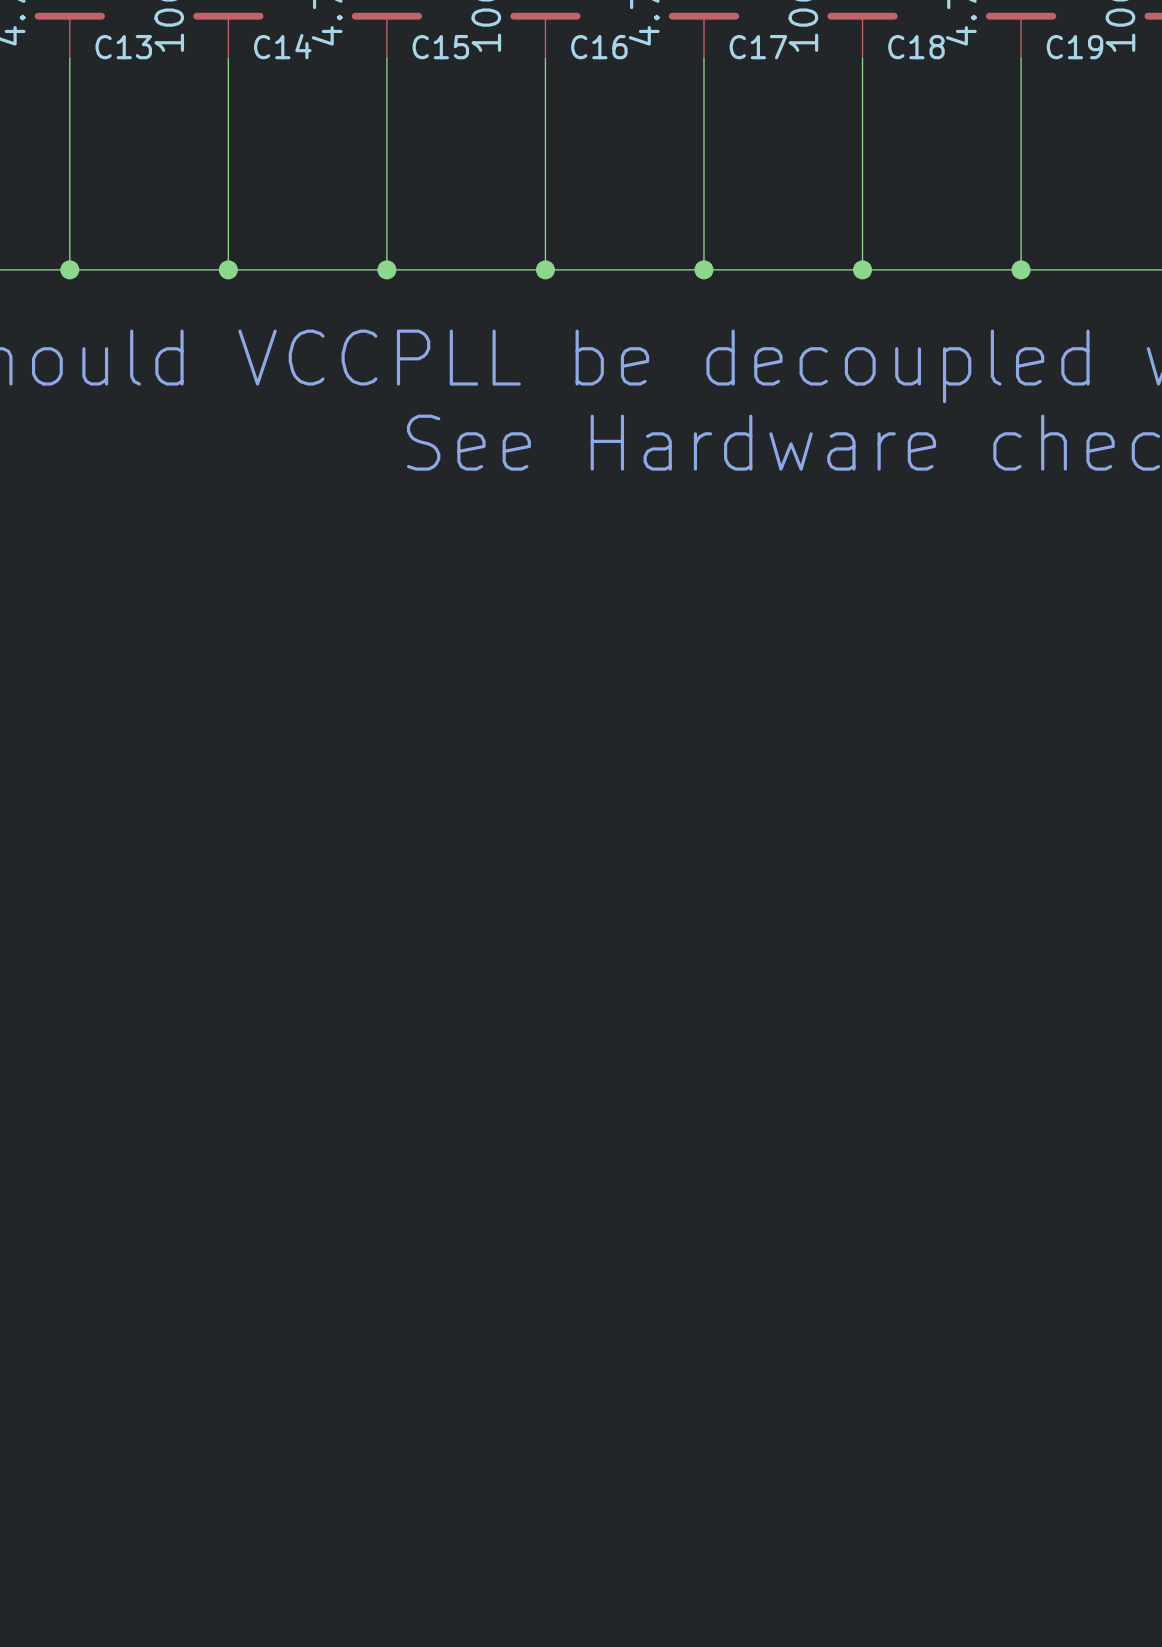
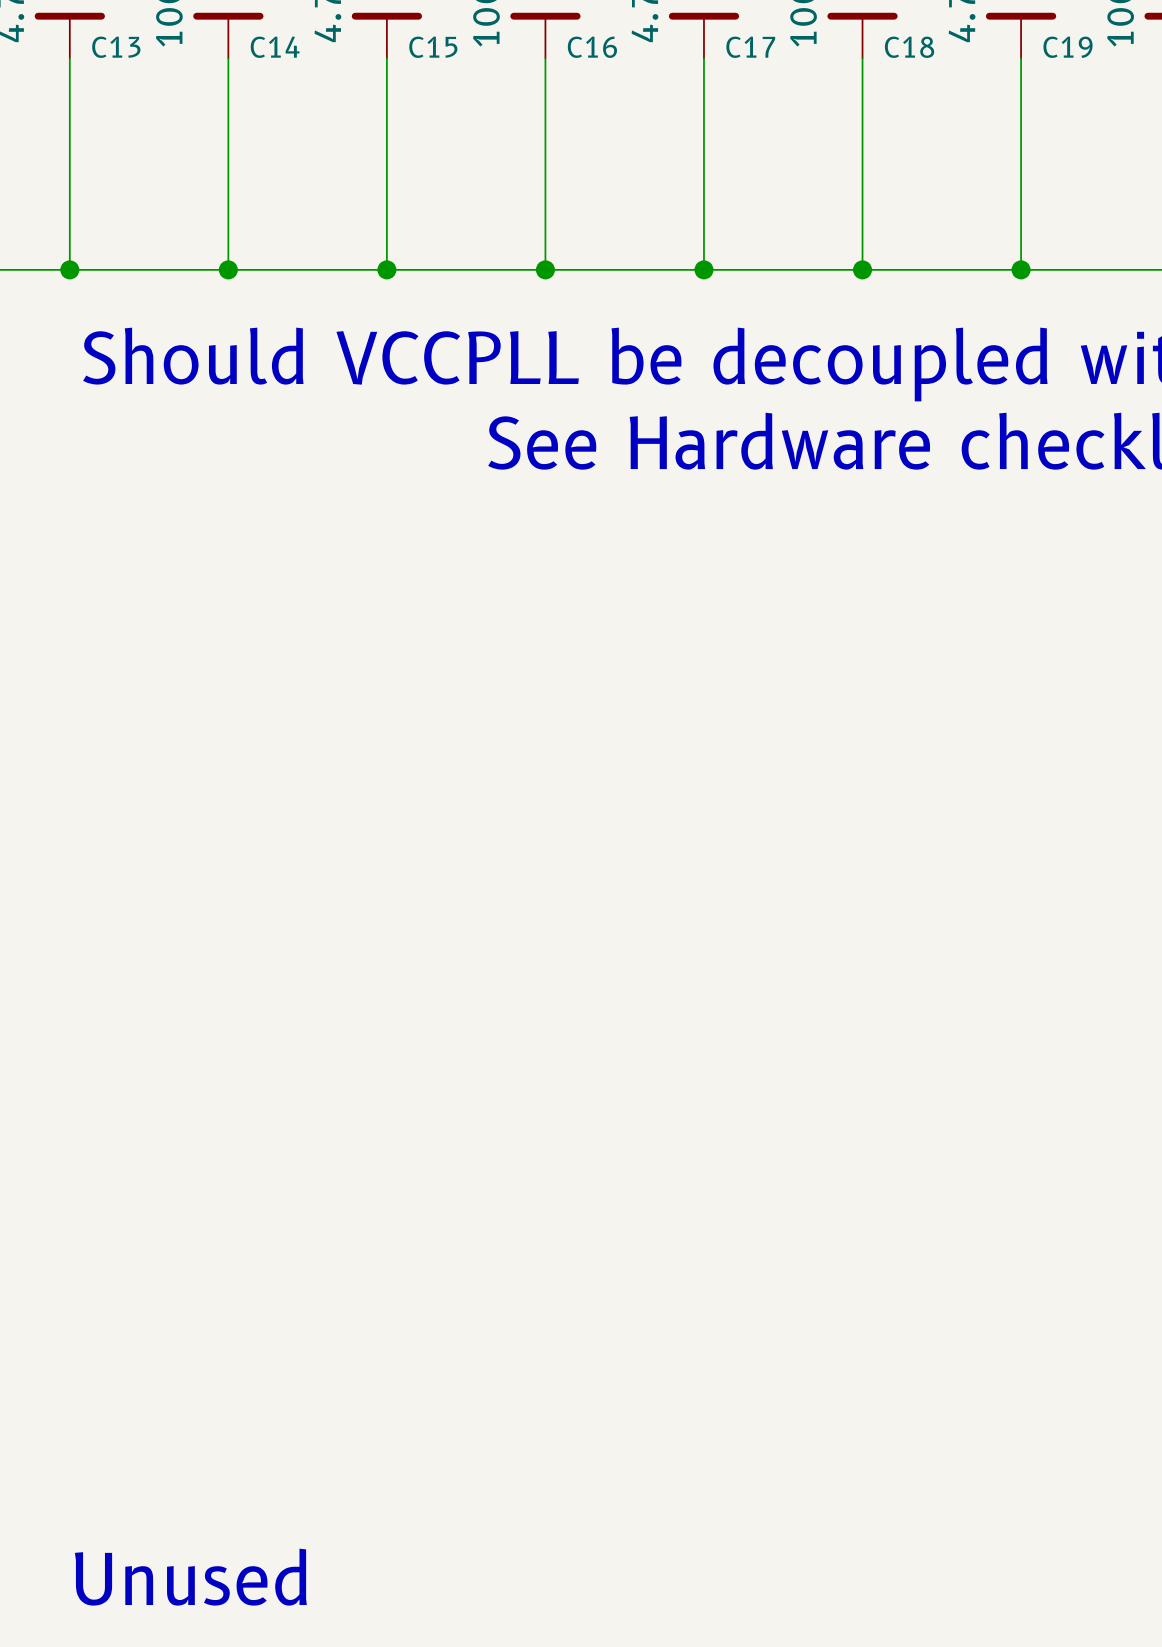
text: none -> Unused (190, 1577)

